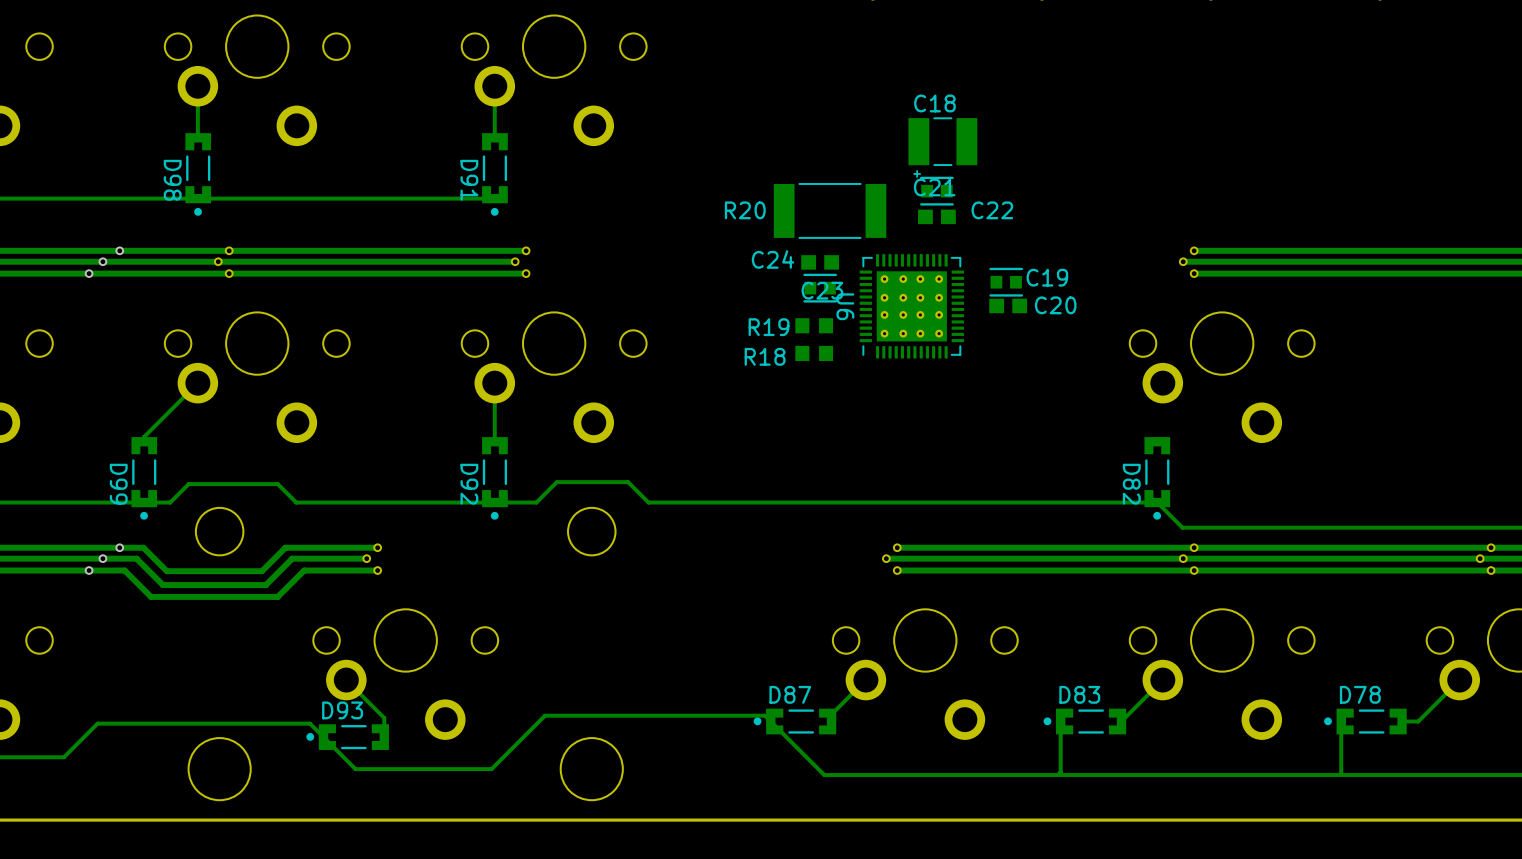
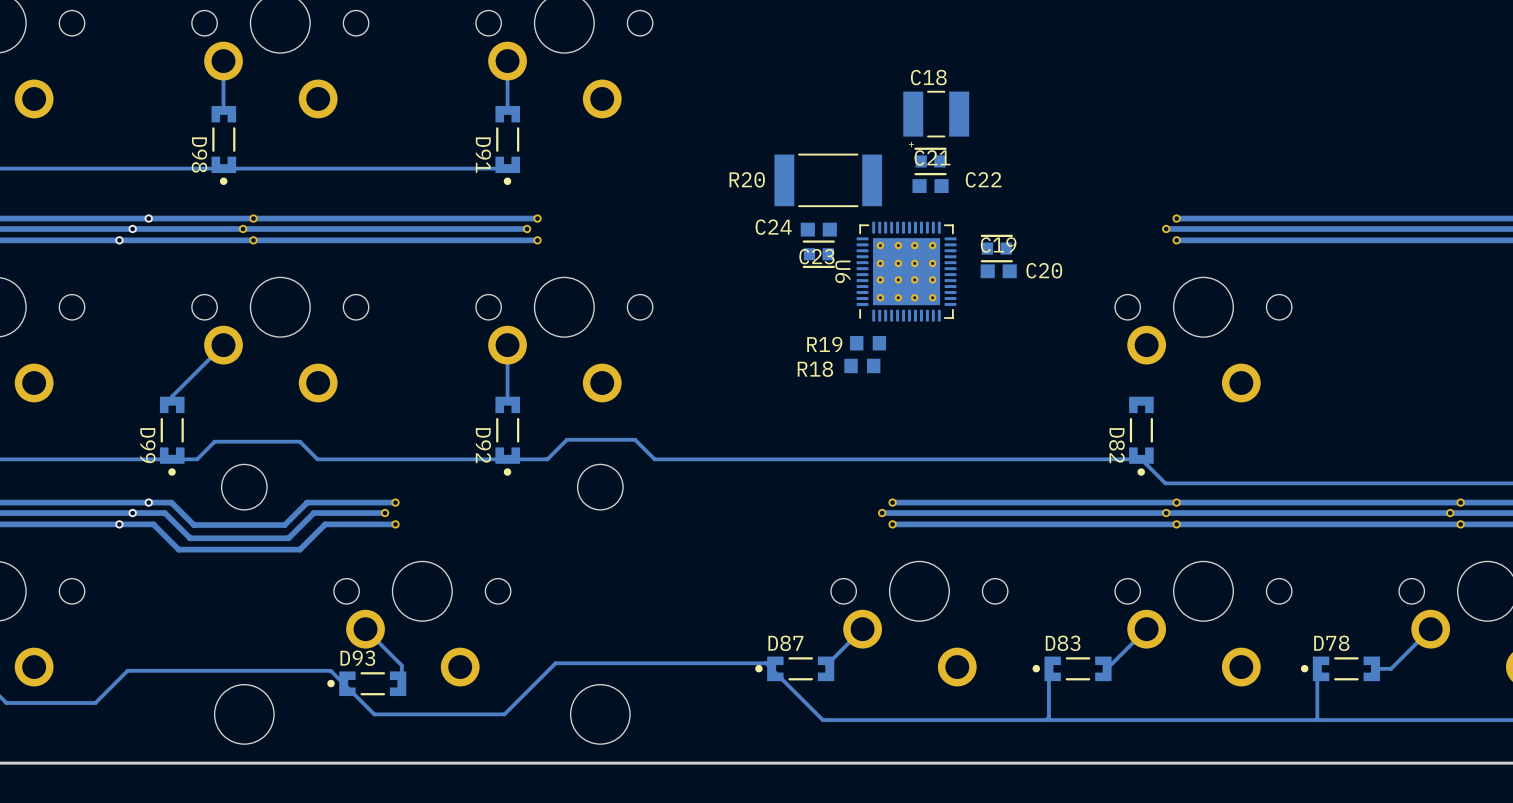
C19 name position: C19 (1047, 277) -> C19 (998, 245)
R19 position: (814, 325) -> (868, 343)
R18 position: (814, 353) -> (862, 365)

